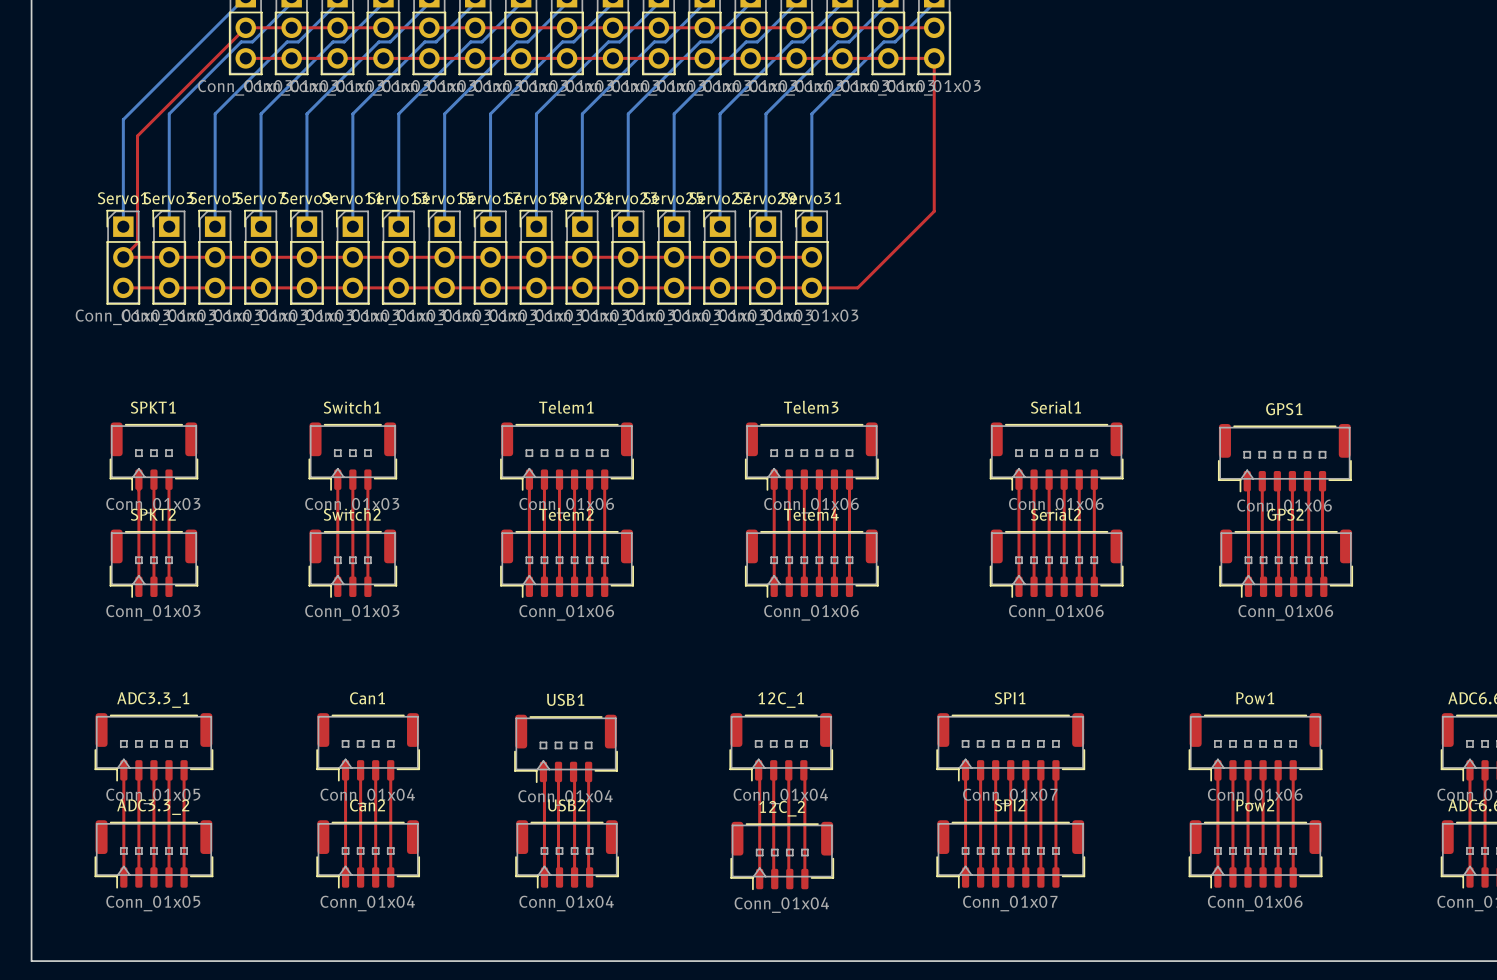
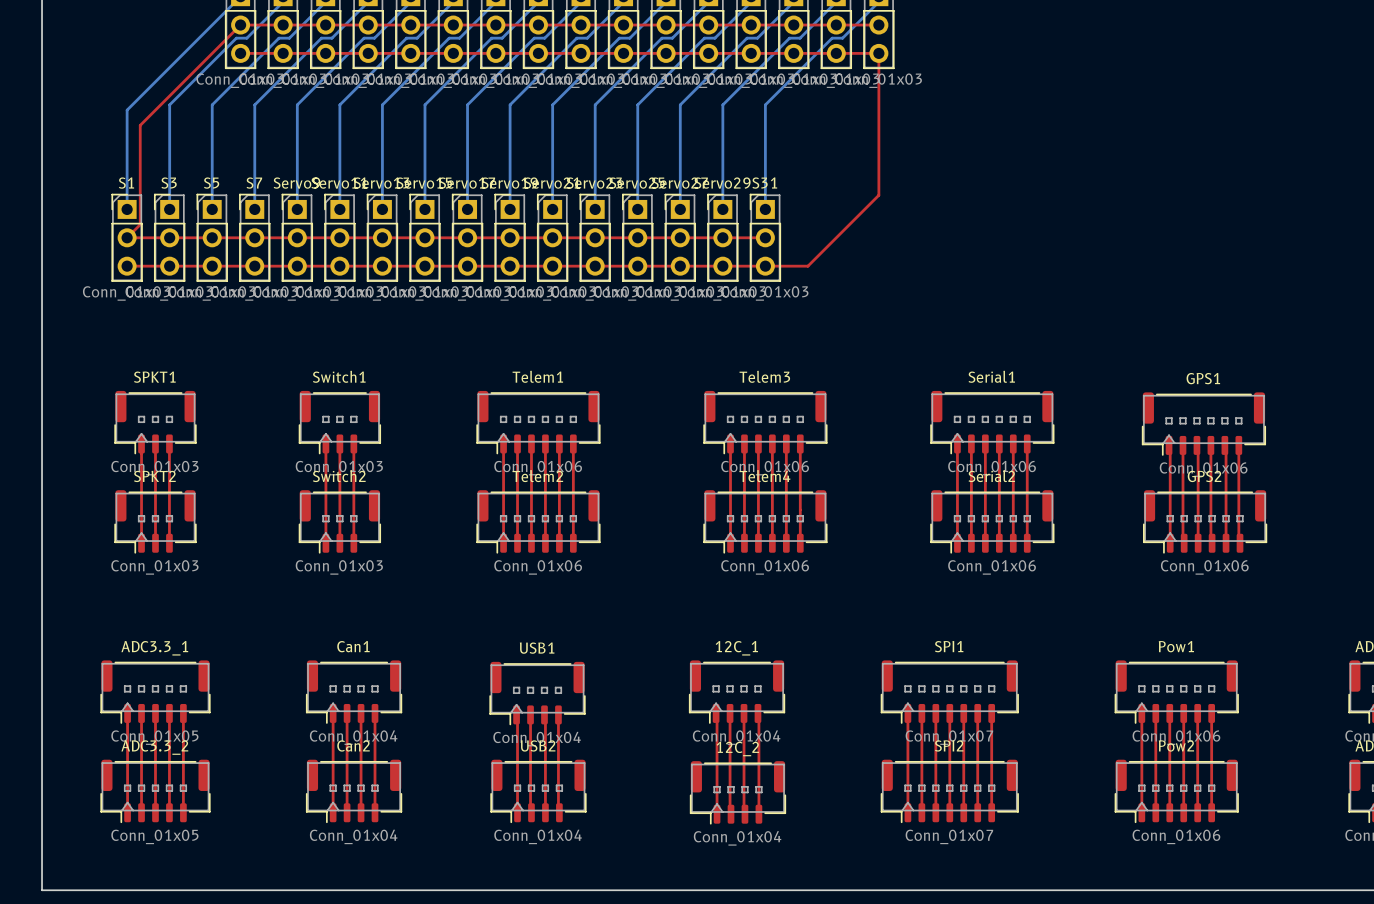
Servo1 name: Servo1 (122, 198) -> S1 (126, 183)
Servo3 name: Servo3 (168, 198) -> S3 (169, 183)
Servo5 name: Servo5 (214, 198) -> S5 (211, 183)
Servo7 name: Servo7 (260, 198) -> S7 (254, 183)
Servo31 name: Servo31 (811, 198) -> S31 (764, 183)

